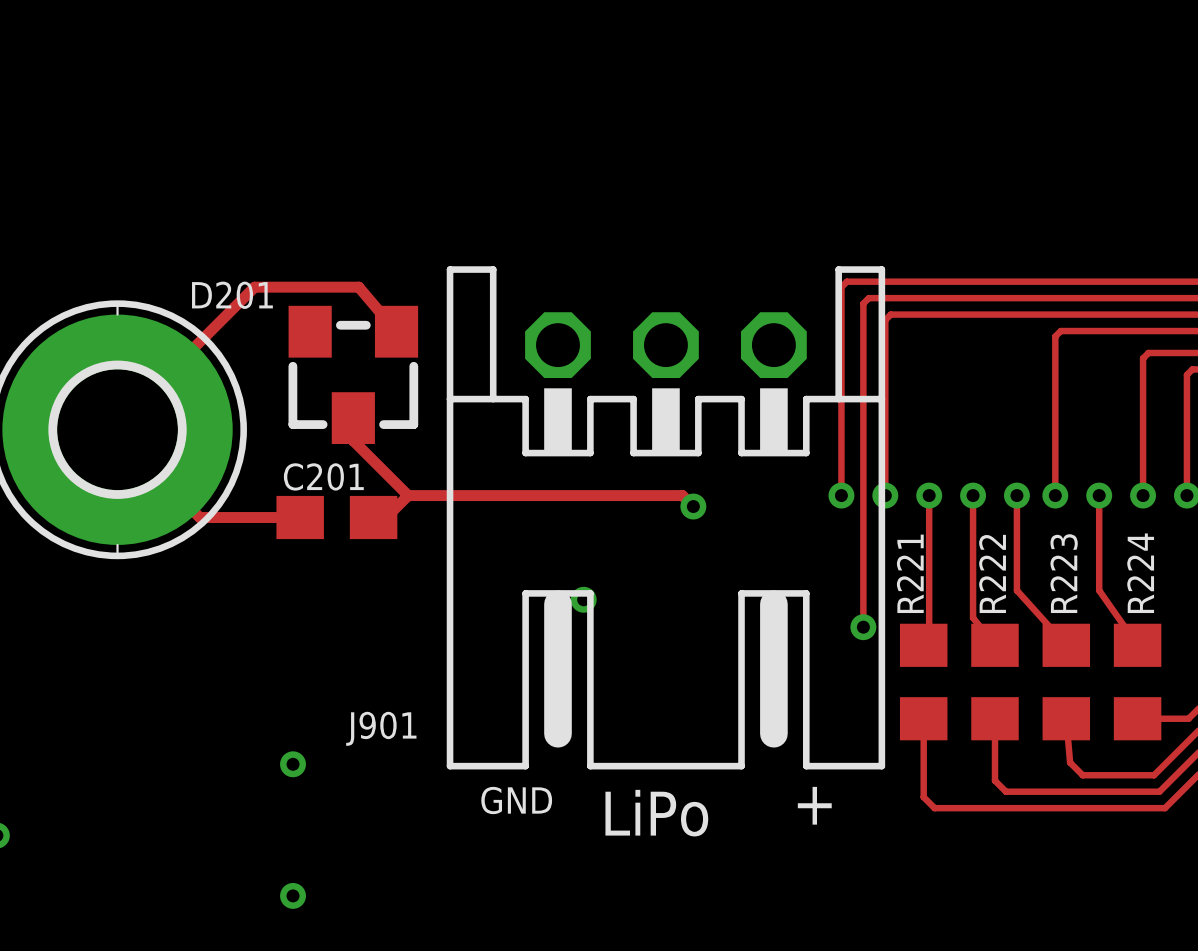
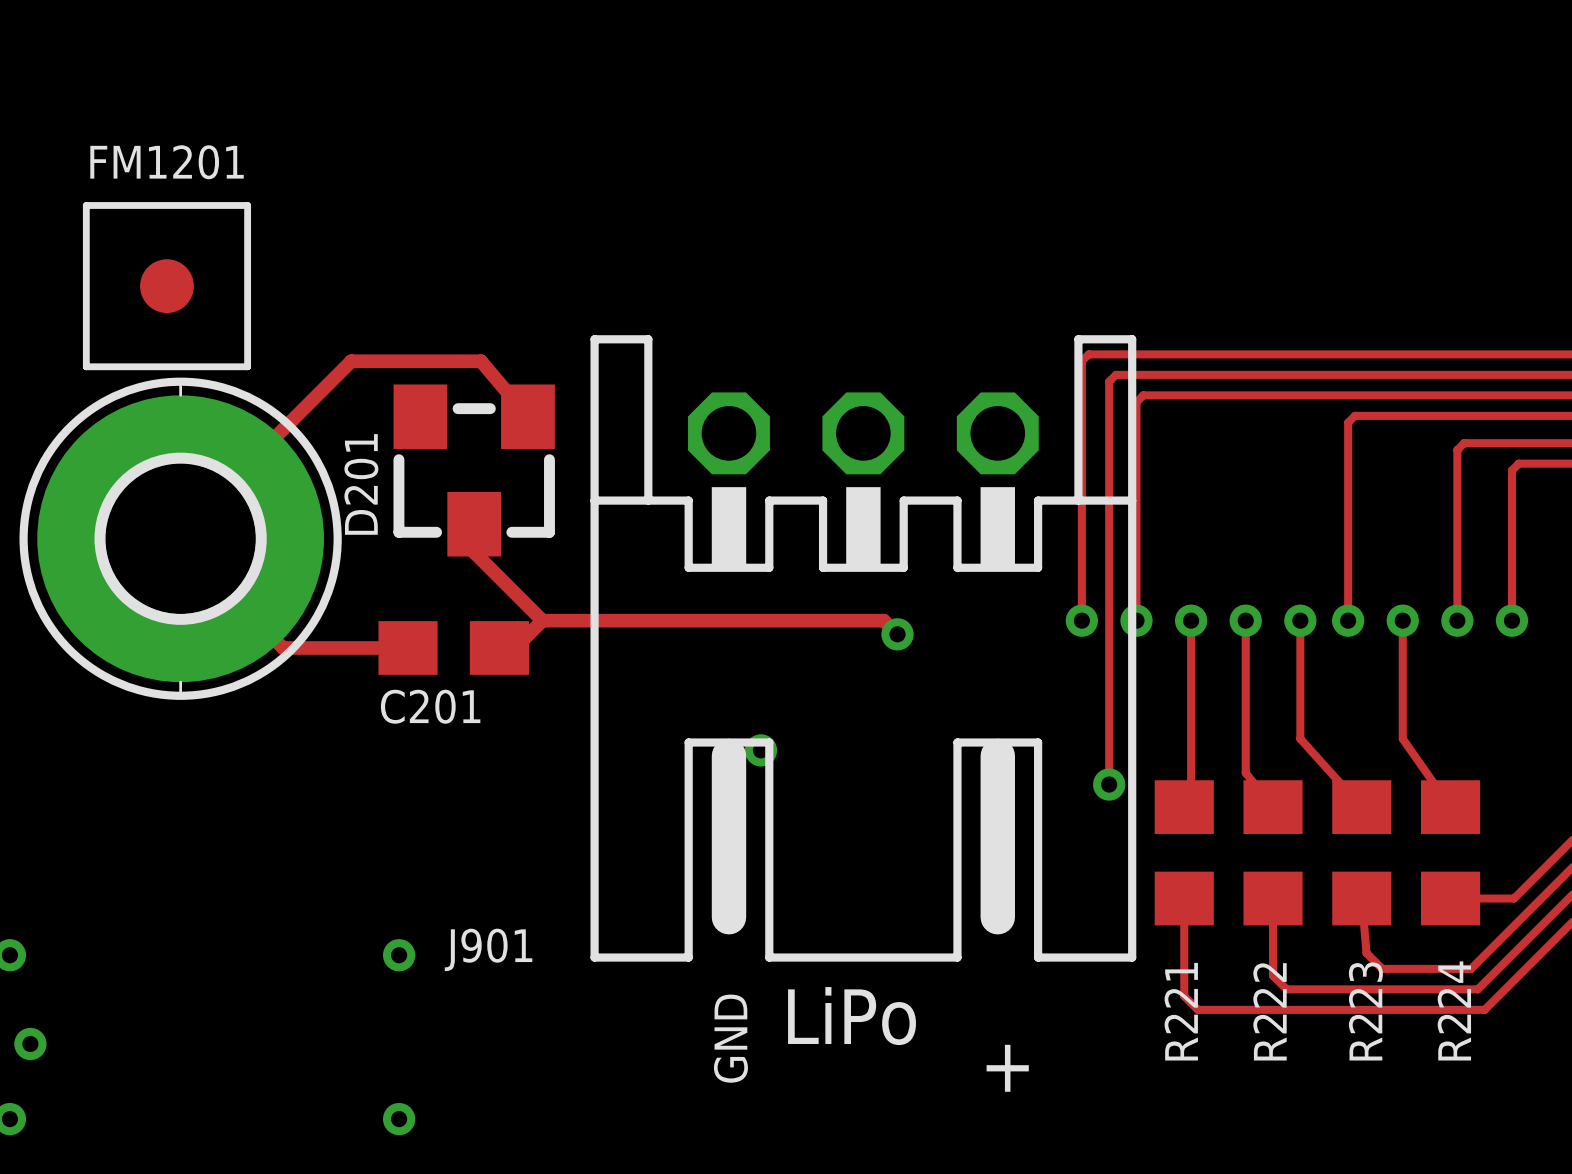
FM1201: none -> (166, 286)
D201 name rotation: 0° (232, 295) -> 90° counterclockwise (361, 484)
C201 name position: C201 (323, 476) -> C201 (430, 706)
R221 name position: R221 (910, 573) -> R221 (1181, 1011)
R222 name position: R222 (992, 573) -> R222 (1270, 1011)
R223 name position: R223 (1064, 573) -> R223 (1365, 1011)
R224 name position: R224 (1140, 573) -> R224 (1454, 1010)
J901 name position: J901 (381, 728) -> J901 (488, 949)
text rotation: 0° (516, 800) -> 90° counterclockwise (730, 1038)
text position: + (814, 805) -> + (1007, 1068)

